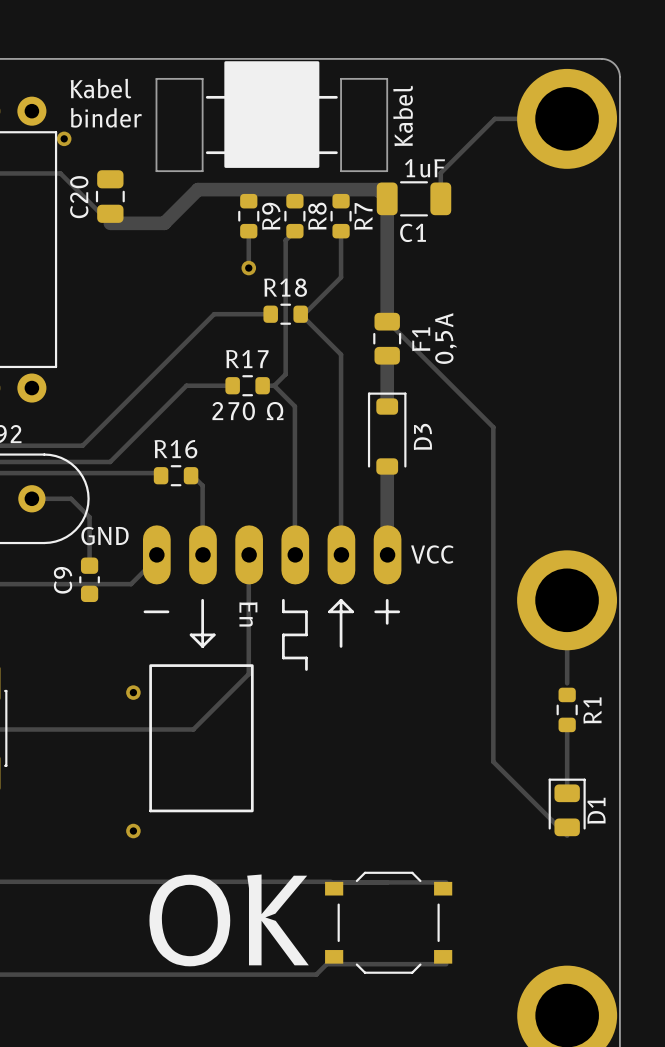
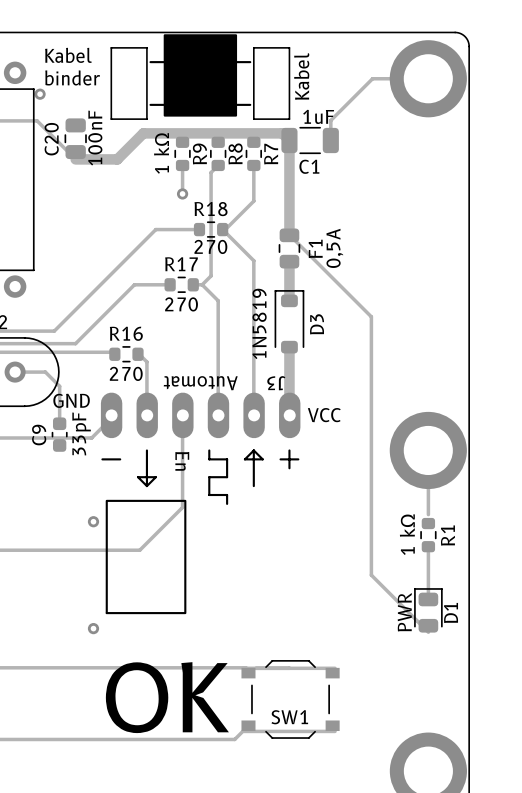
C20 value: none -> 100nF (95, 138)
R9 value: none -> 1 kΩ (161, 153)
R18 value: none -> 270 (210, 246)
R17 value: 270 Ω (247, 411) -> 270 (181, 304)
D3 value: none -> 1N5819 (259, 323)
R16 value: none -> 270 (126, 373)
J3 value: none -> Automat (200, 383)
J3 name: none -> J3 (276, 383)
C9 value: none -> 33pF (81, 433)
R1 value: none -> 1 kΩ (407, 534)
D1 value: none -> PWR (404, 612)
SW1 name: none -> SW1 (289, 717)

